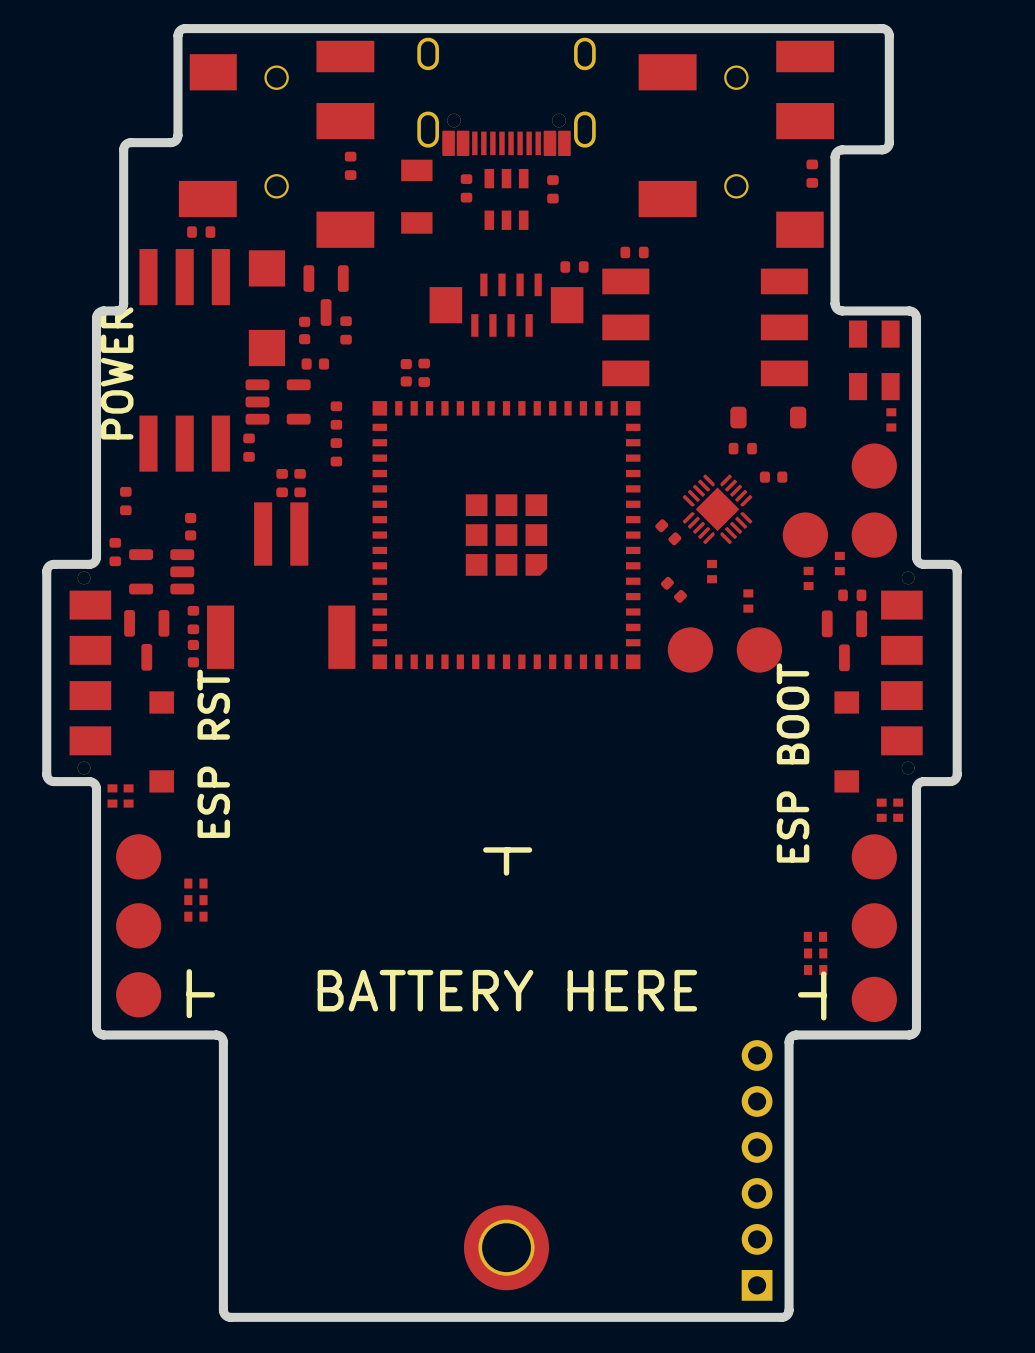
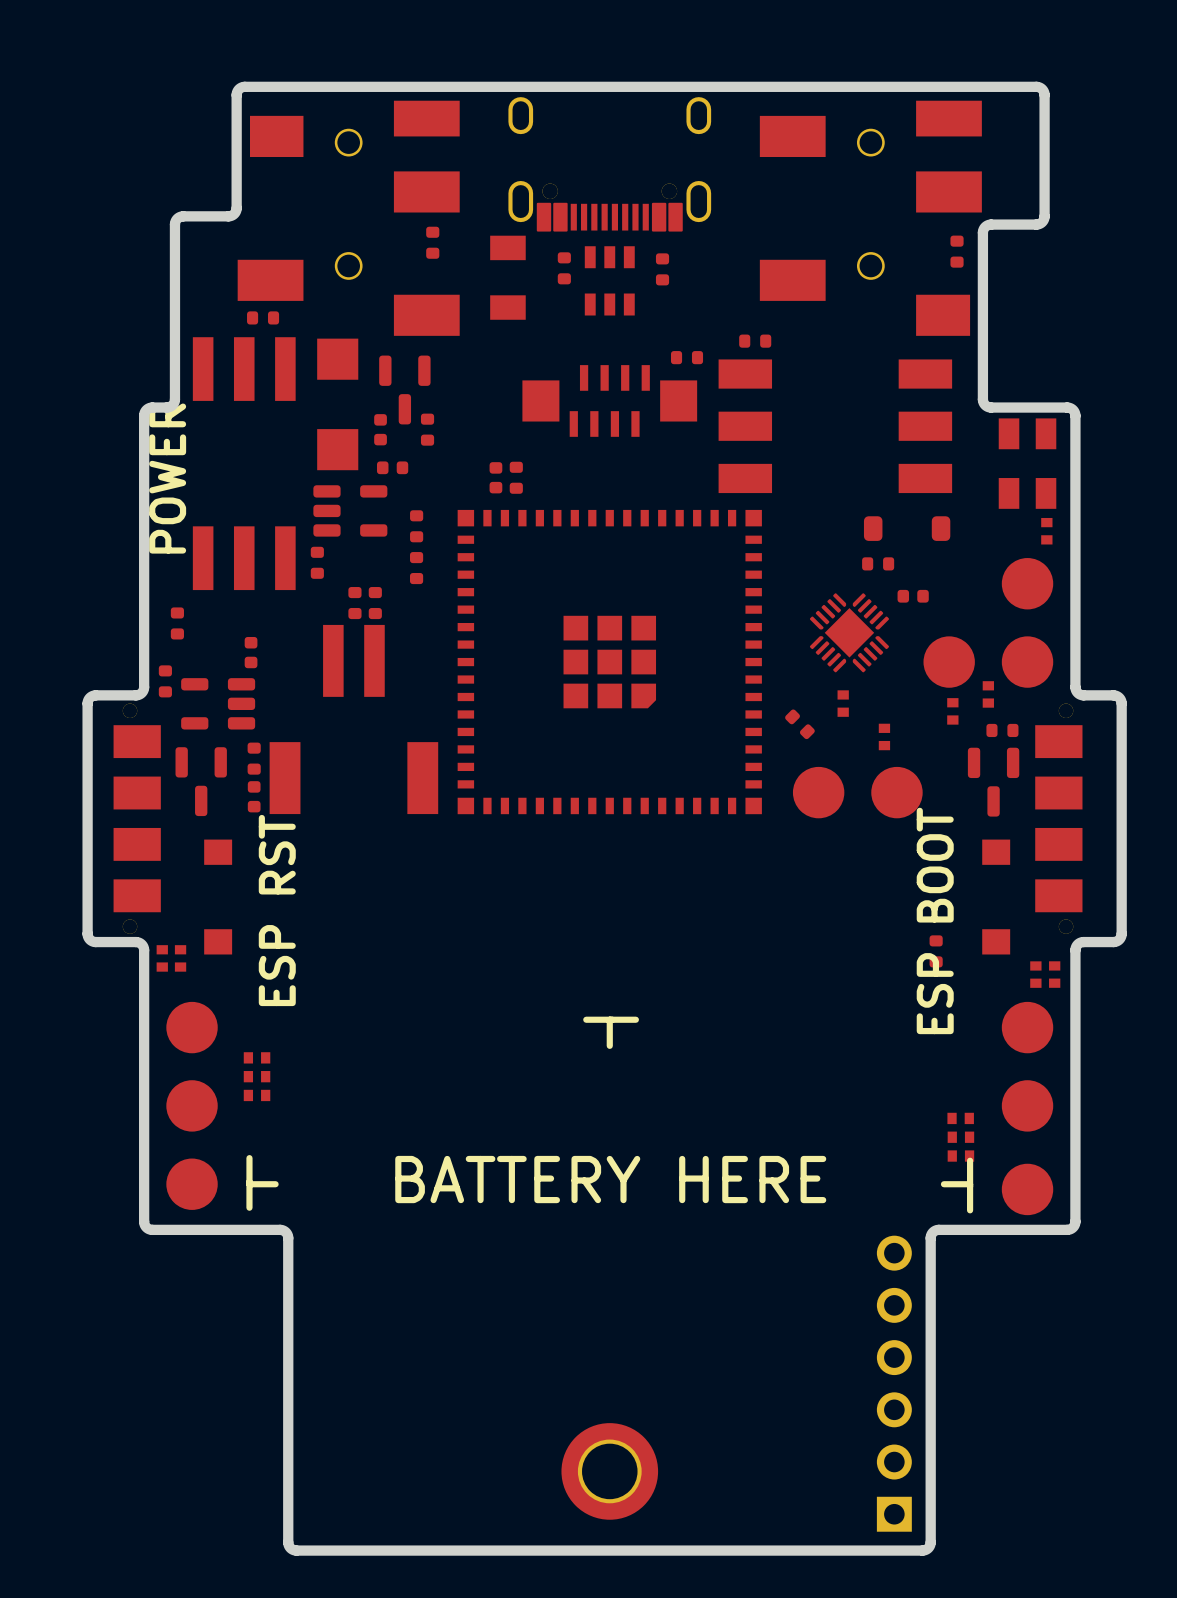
part: (668, 532) -> none
part: none -> (936, 951)

